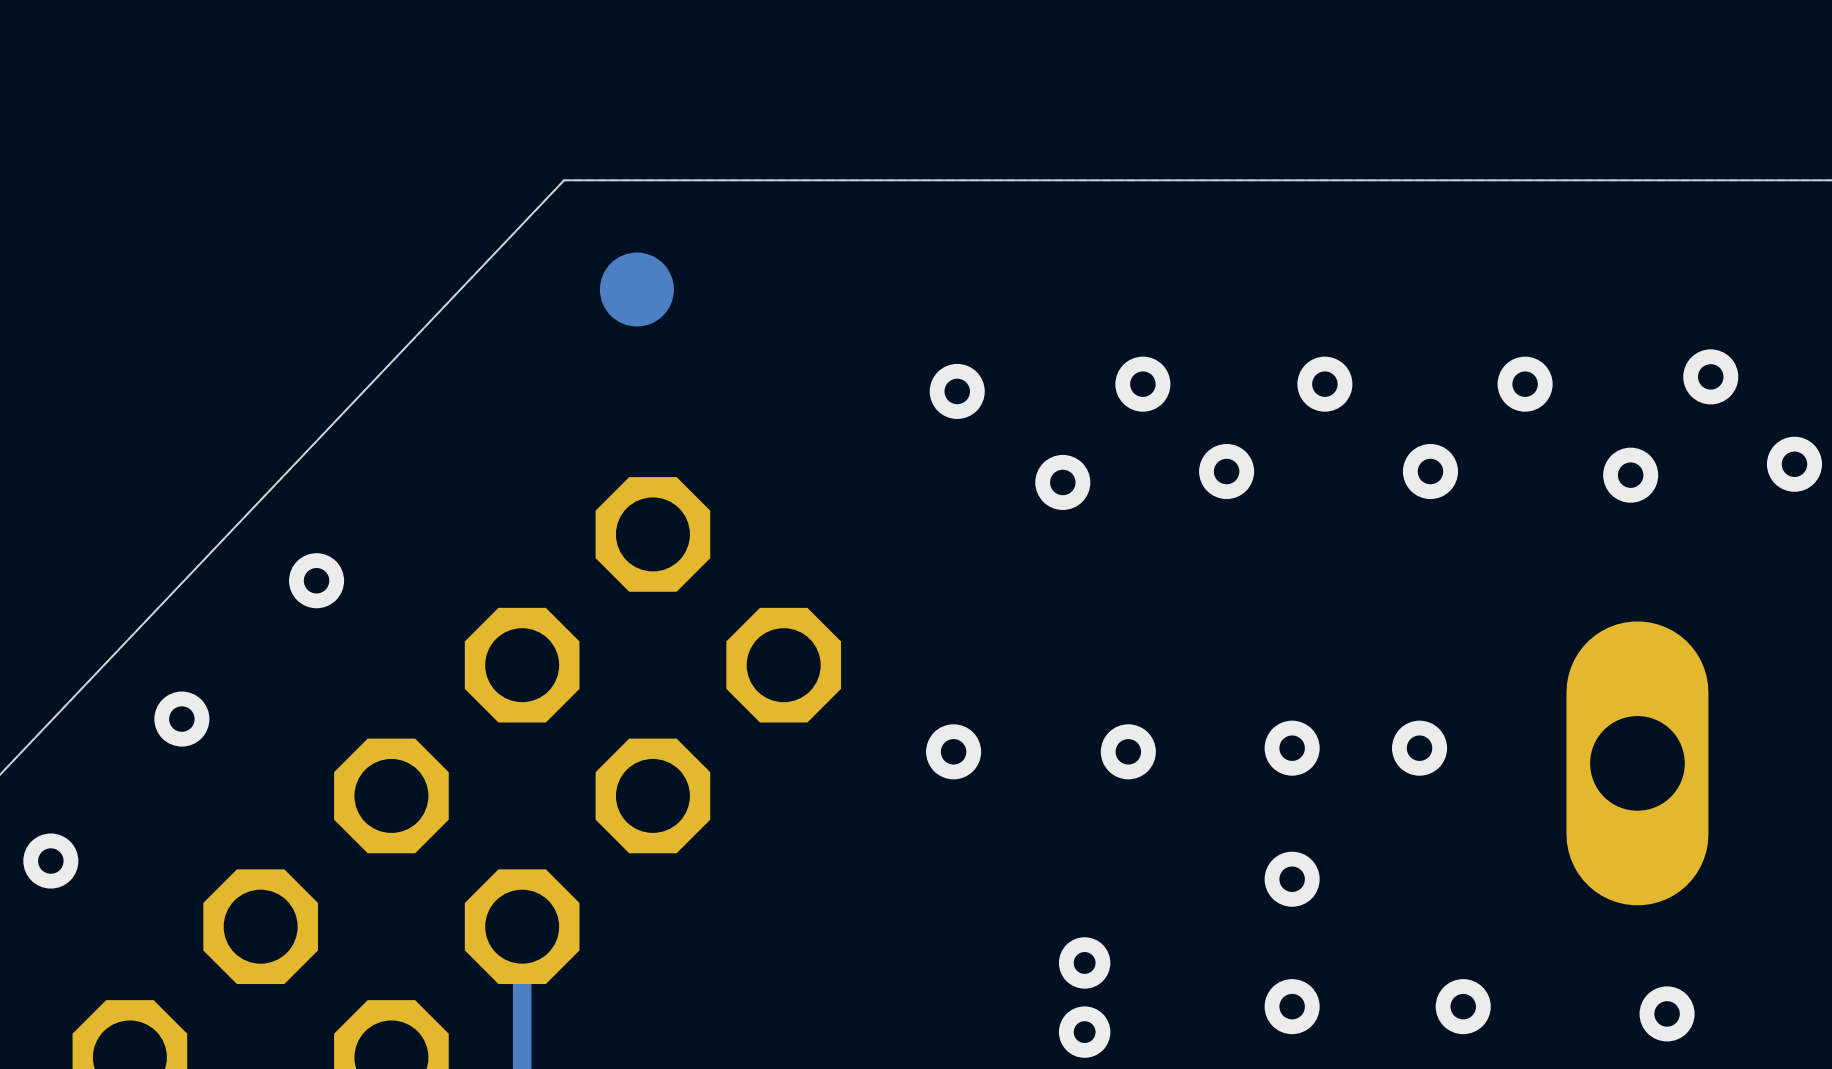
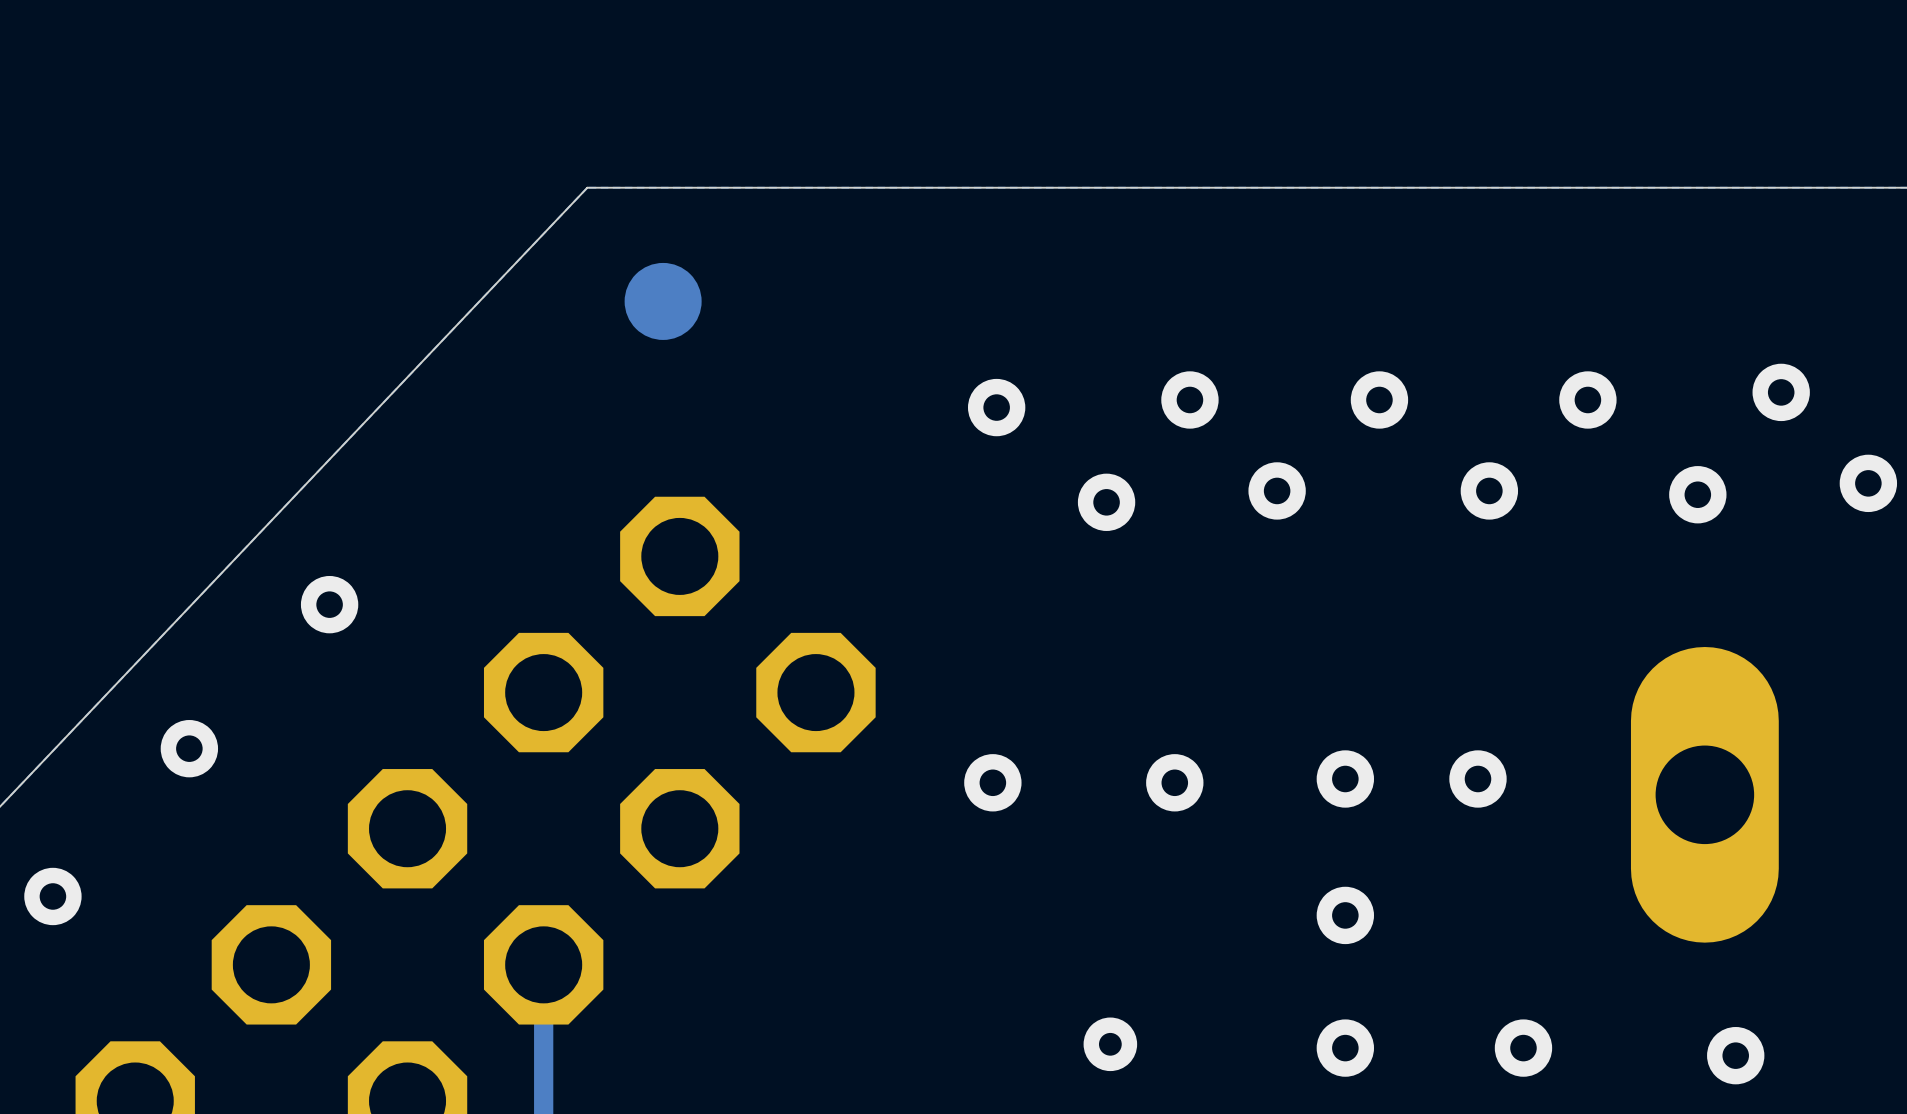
via: (1084, 962) -> none
via: none -> (1110, 1044)
via: (1084, 1032) -> none

